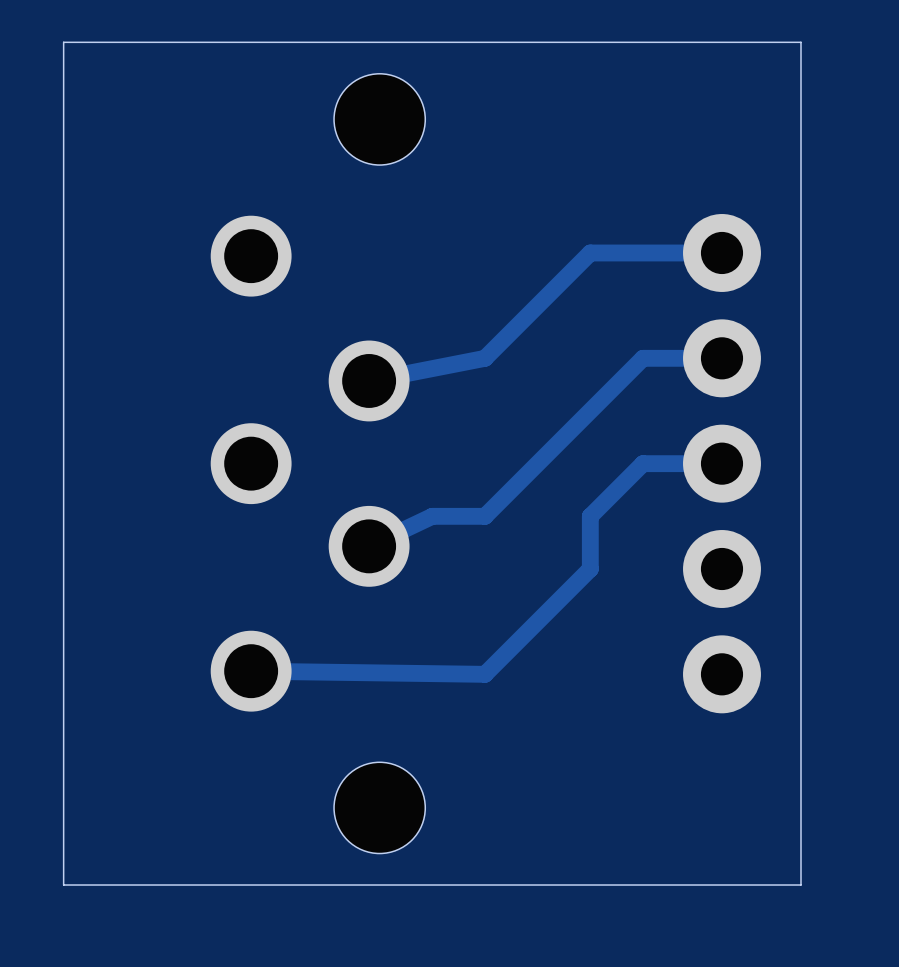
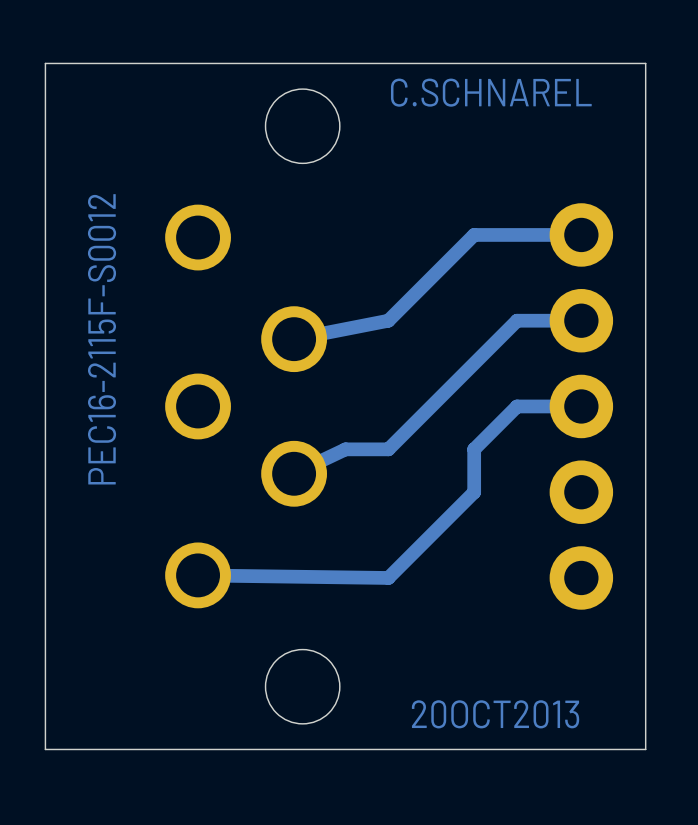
text: none -> C.SCHNAREL (491, 92)
text: none -> PEC16-2115F-S0012 (102, 339)
text: none -> 20OCT2013 (495, 714)

